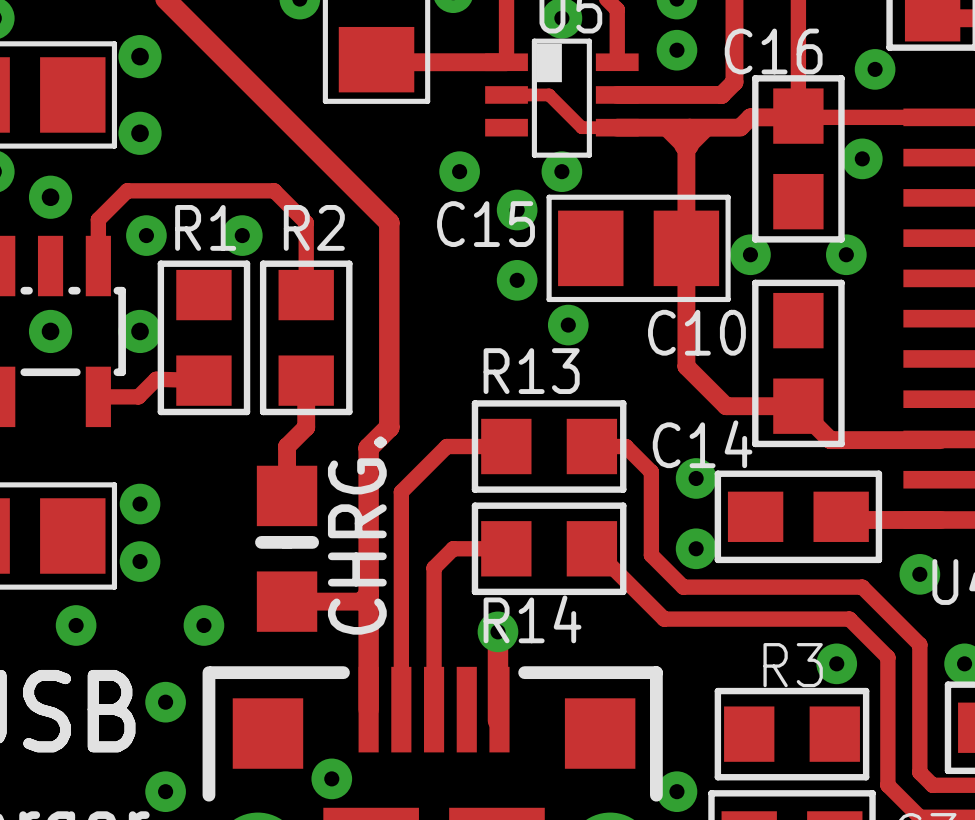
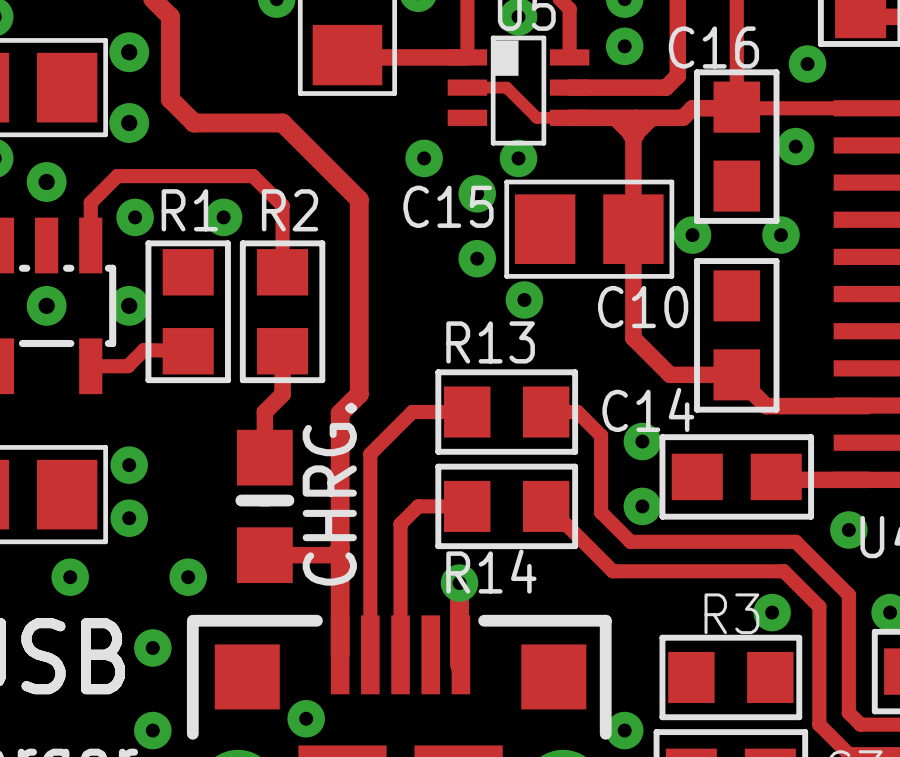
track: (184, 18) (389, 222) -> (170, 16) (170, 99) (194, 123) (282, 123) (359, 199) (359, 205)

